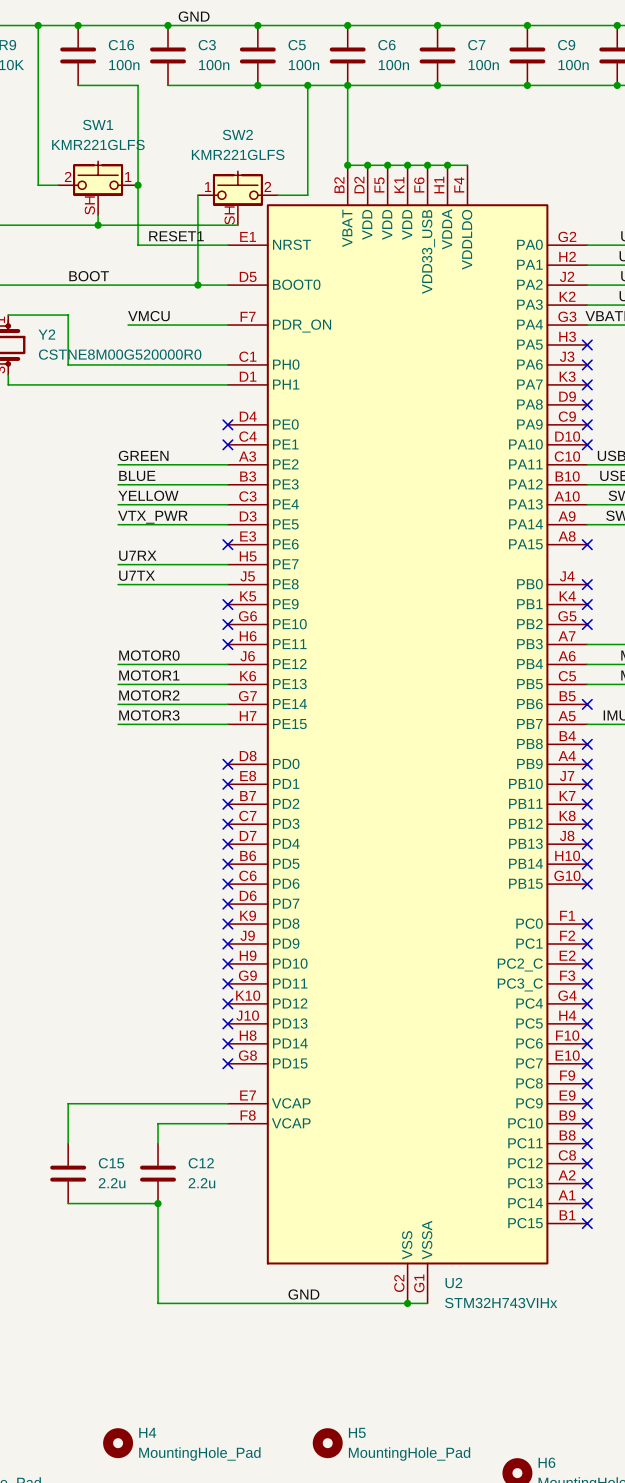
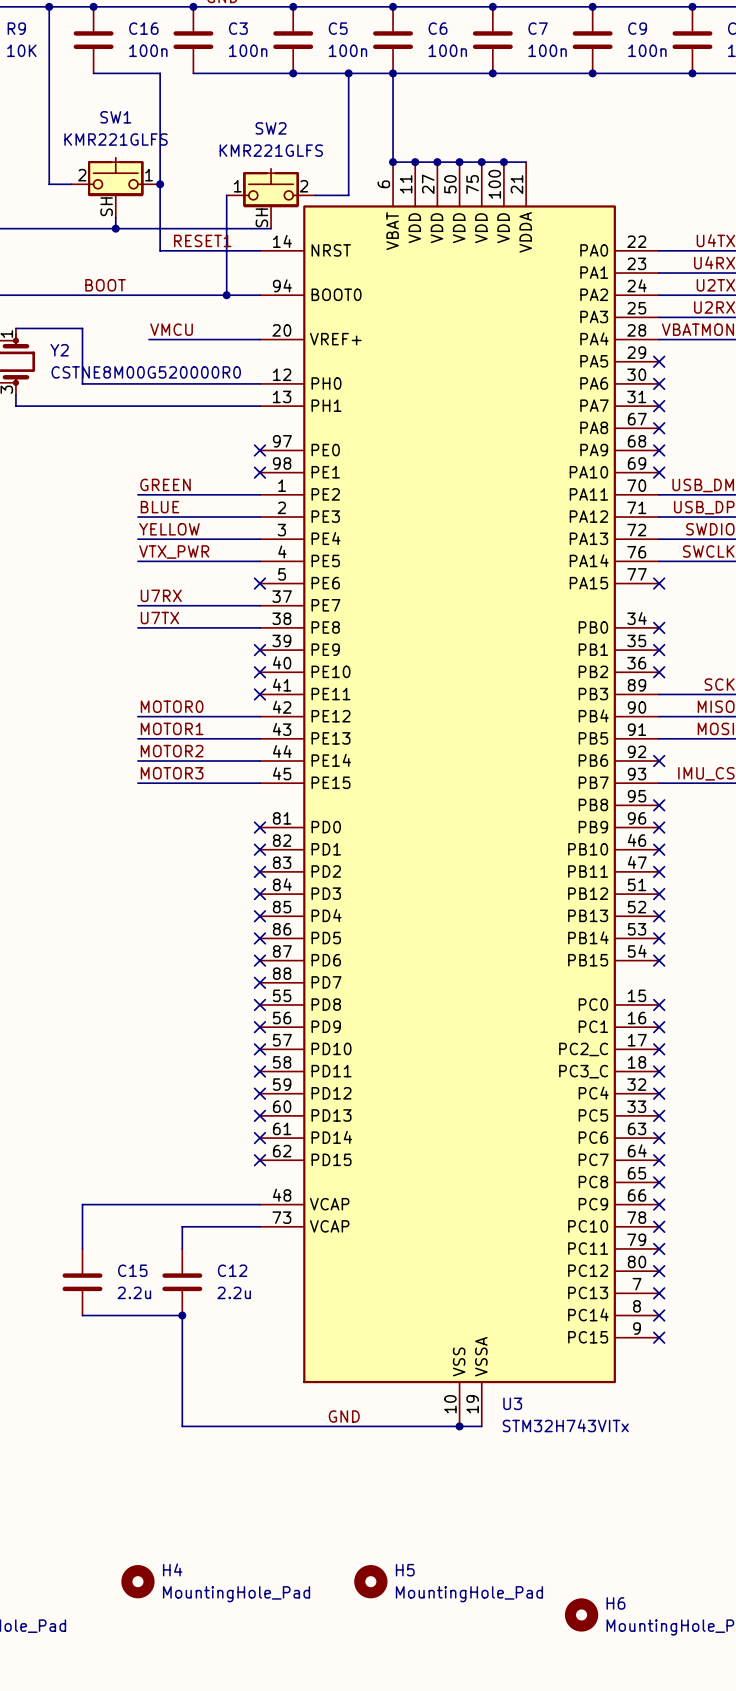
U2 symbol: [227, 165, 588, 1304] -> [259, 162, 660, 1427]
U2 name: U2 (453, 1283) -> U3 (512, 1403)
U2 value: STM32H743VIHx (501, 1303) -> STM32H743VITx (565, 1425)

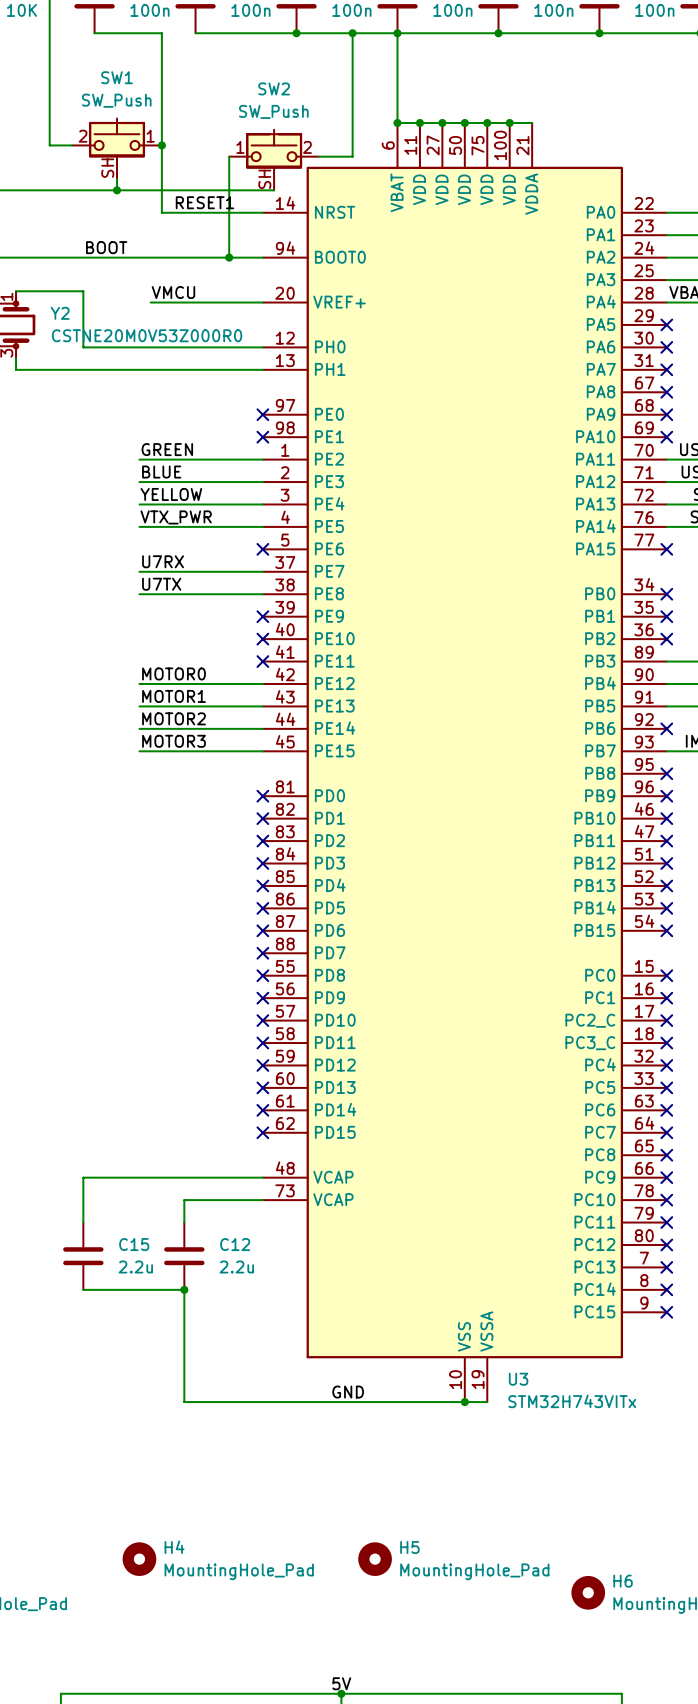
SW1 value: KMR221GLFS (116, 139) -> SW_Push (116, 100)
SW2 value: KMR221GLFS (271, 150) -> SW_Push (273, 111)
Y2 value: CSTNE8M00G520000R0 (146, 372) -> CSTNE20M0V53Z000R0 (147, 335)

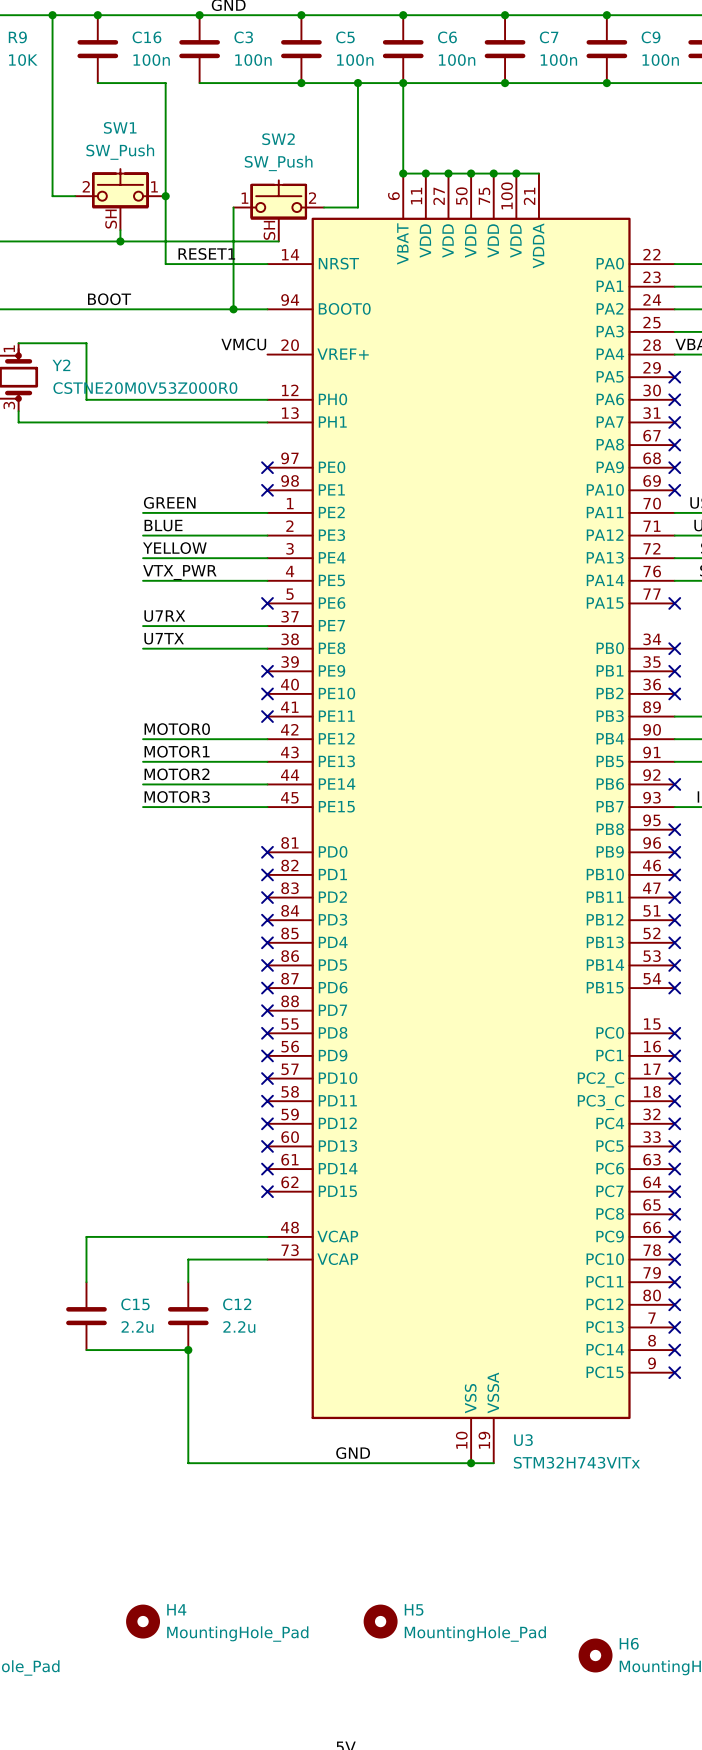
label position: VMCU (173, 292) -> VMCU (243, 344)
wire: (150, 302) (262, 302) -> none

